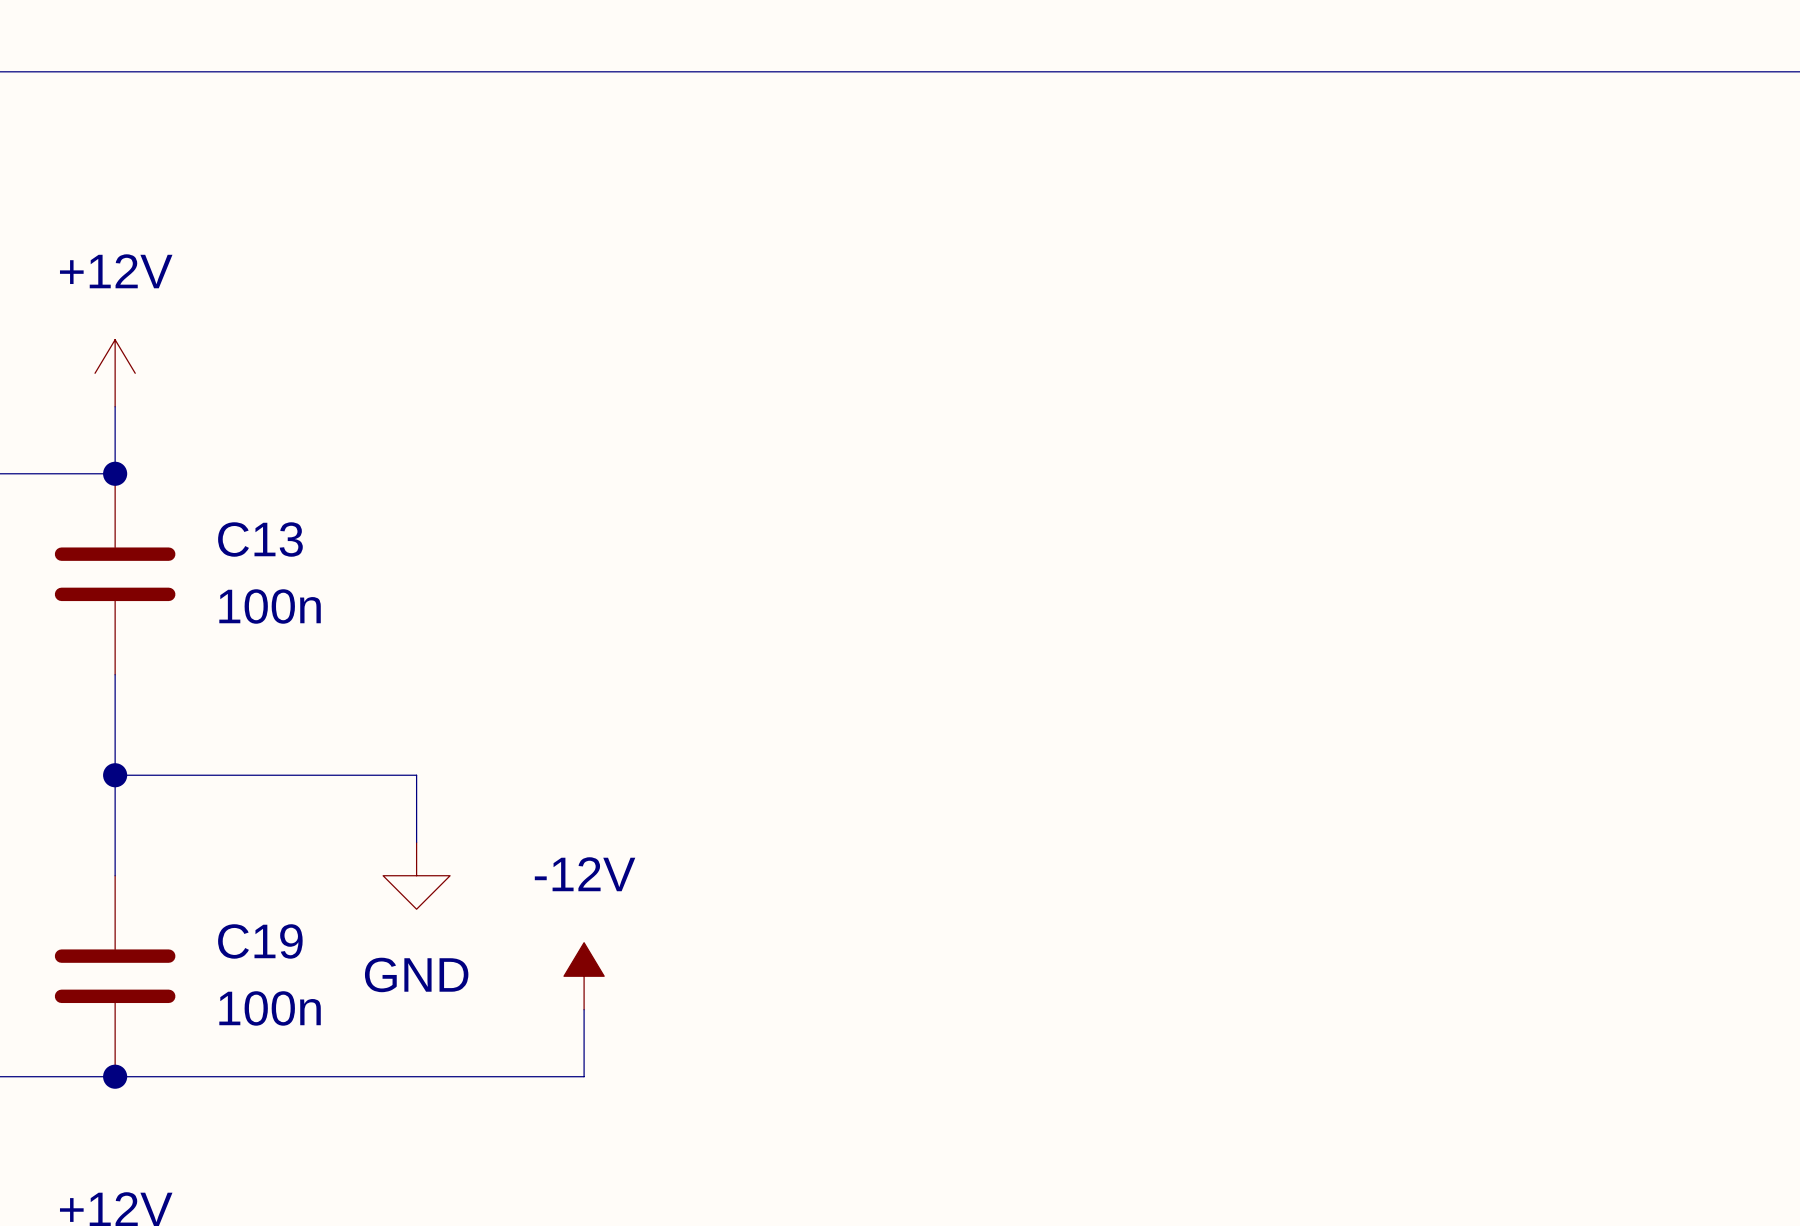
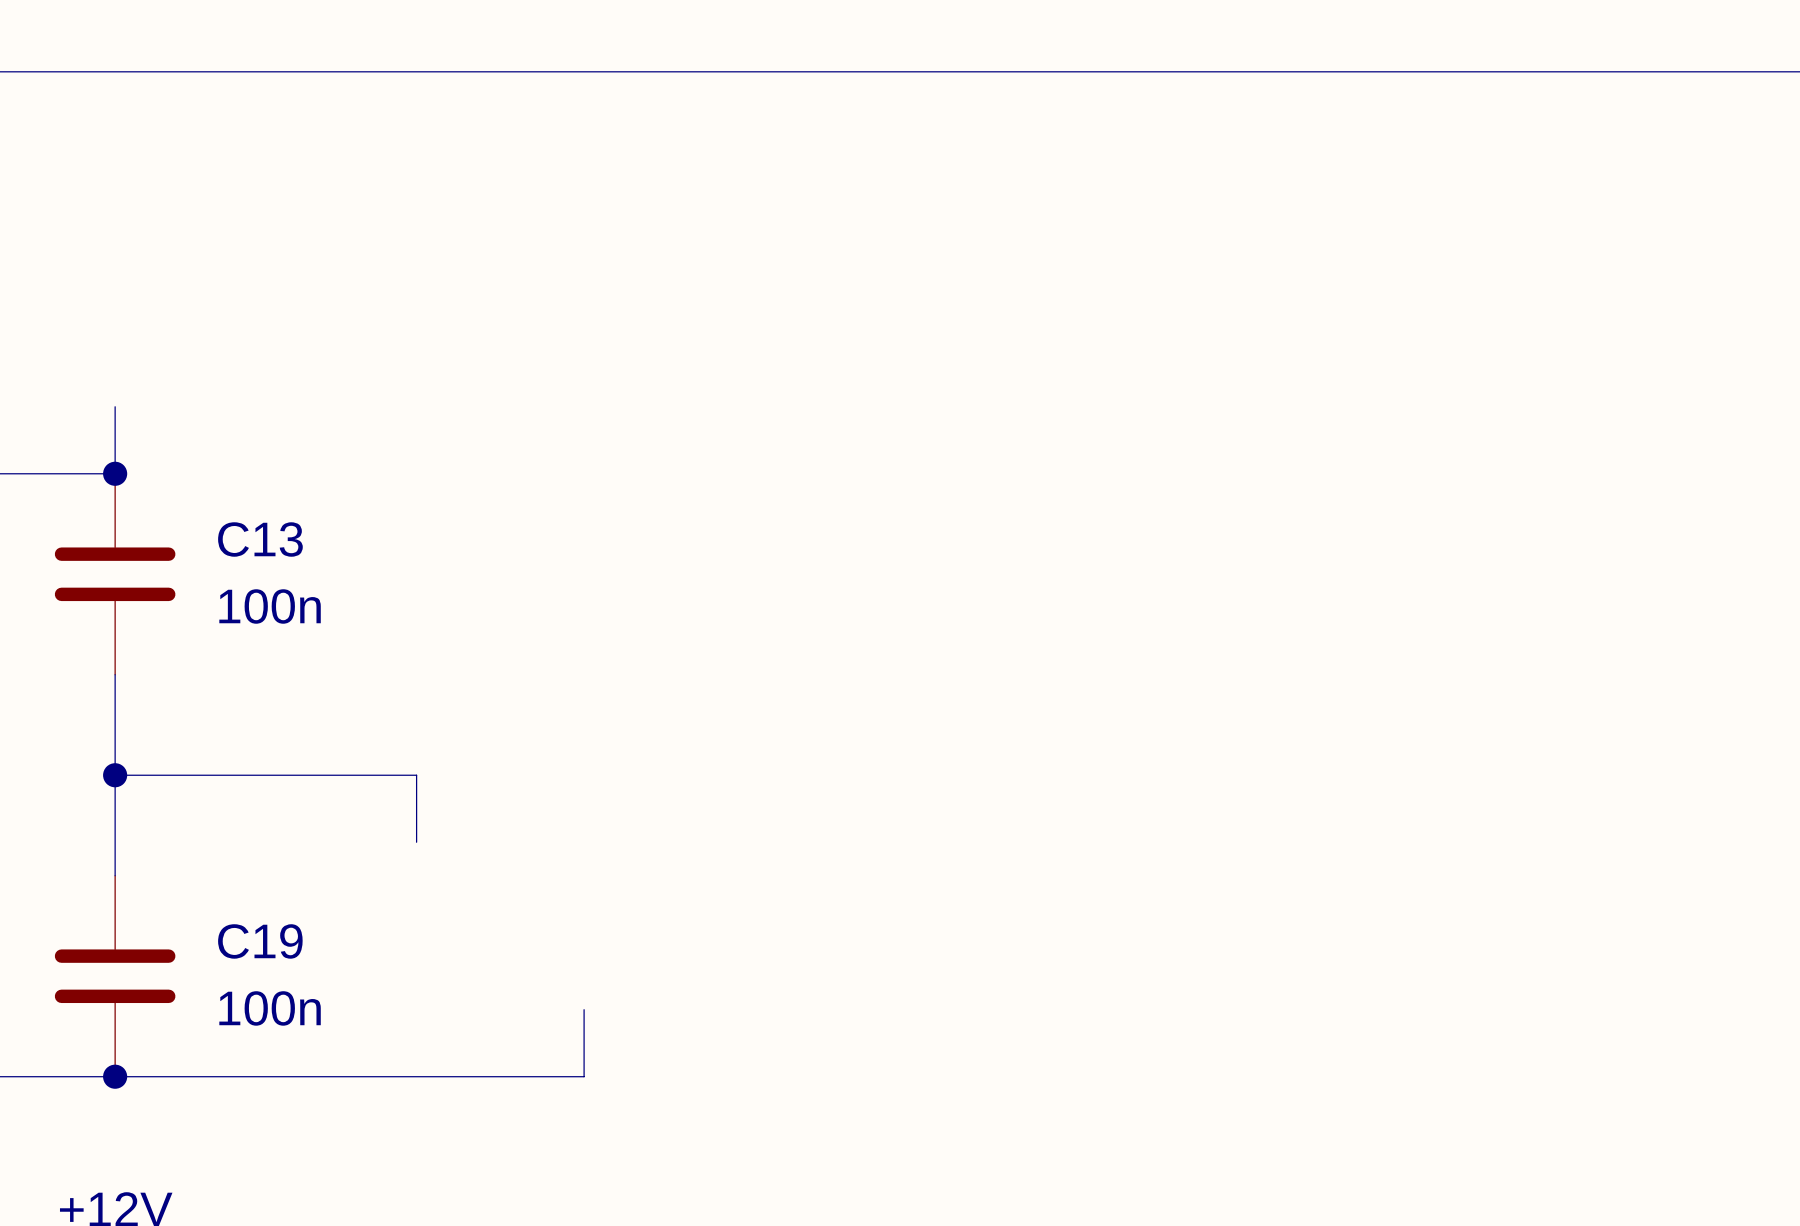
power symbol: +12V (115, 373) -> none
power symbol: GND (416, 875) -> none
power symbol: -12V (584, 976) -> none

